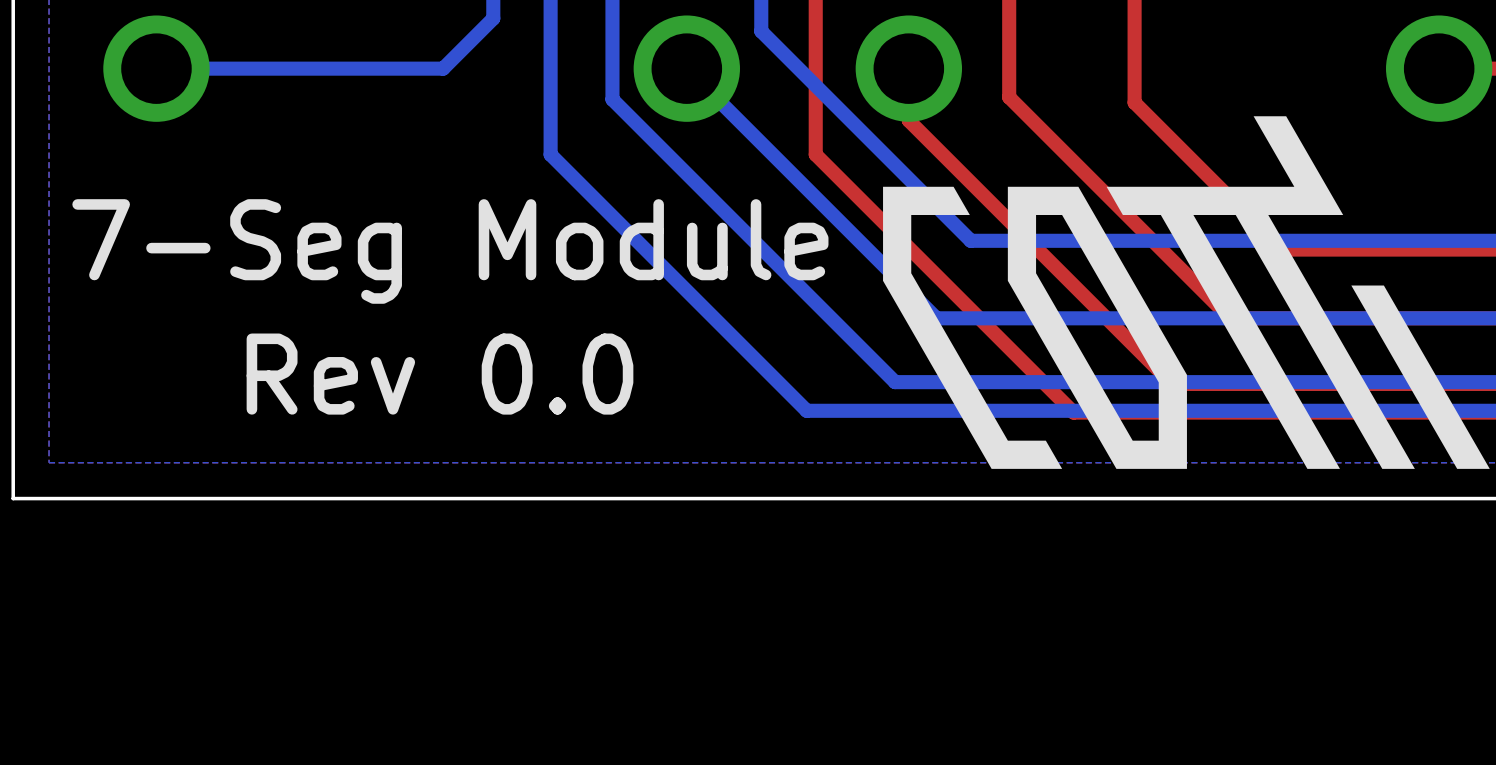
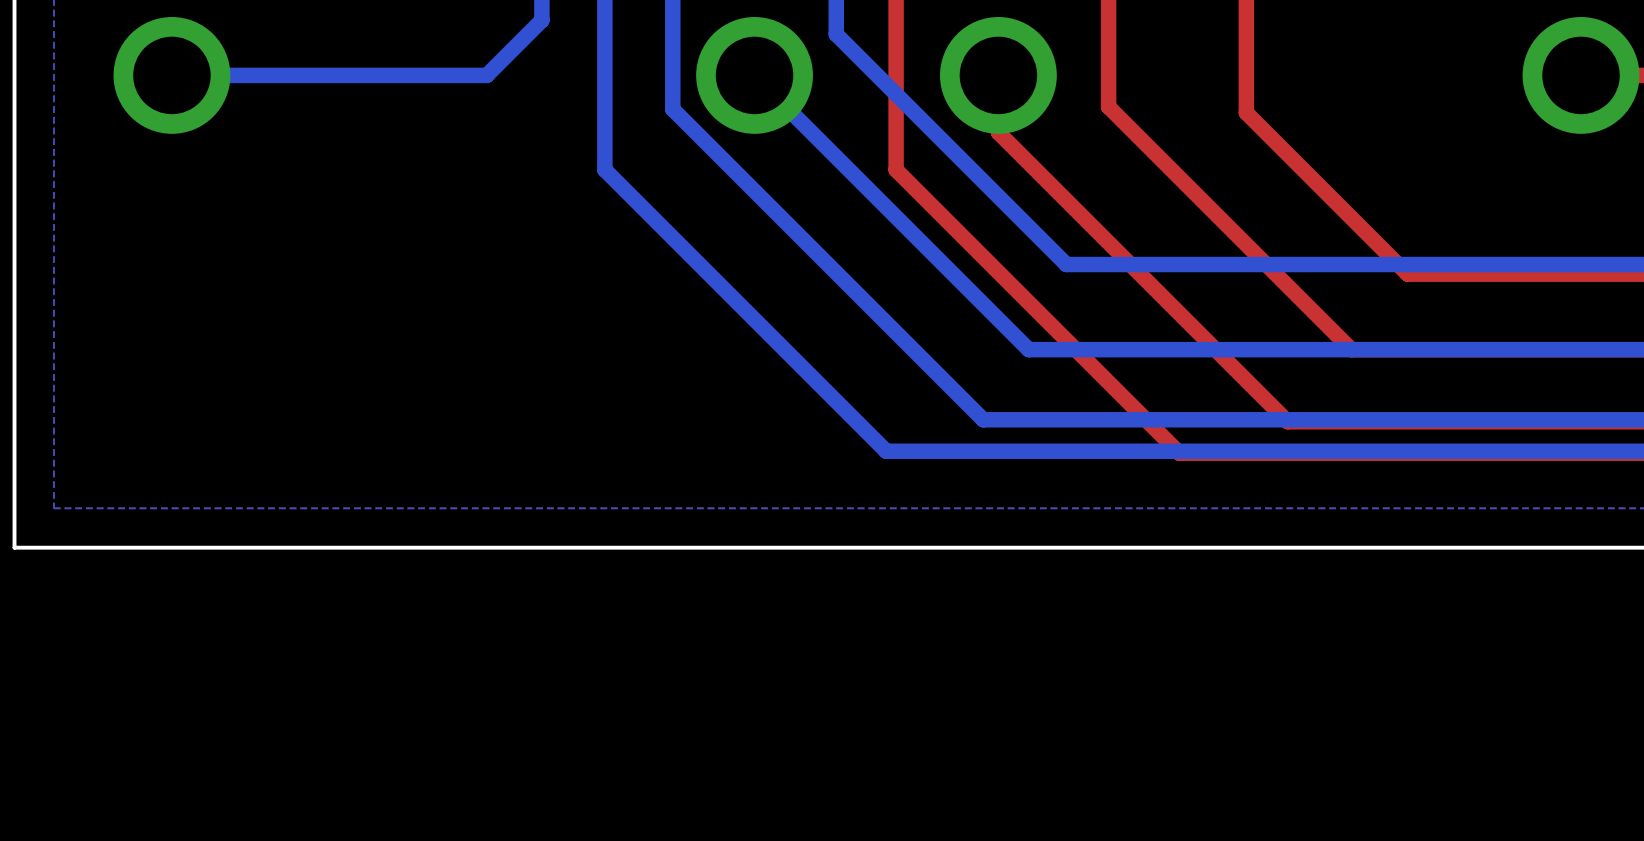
drawing: [883, 116, 1490, 469] -> none
text: 7-Seg Module (450, 251) -> none
text: Rev 0.0 (439, 374) -> none

